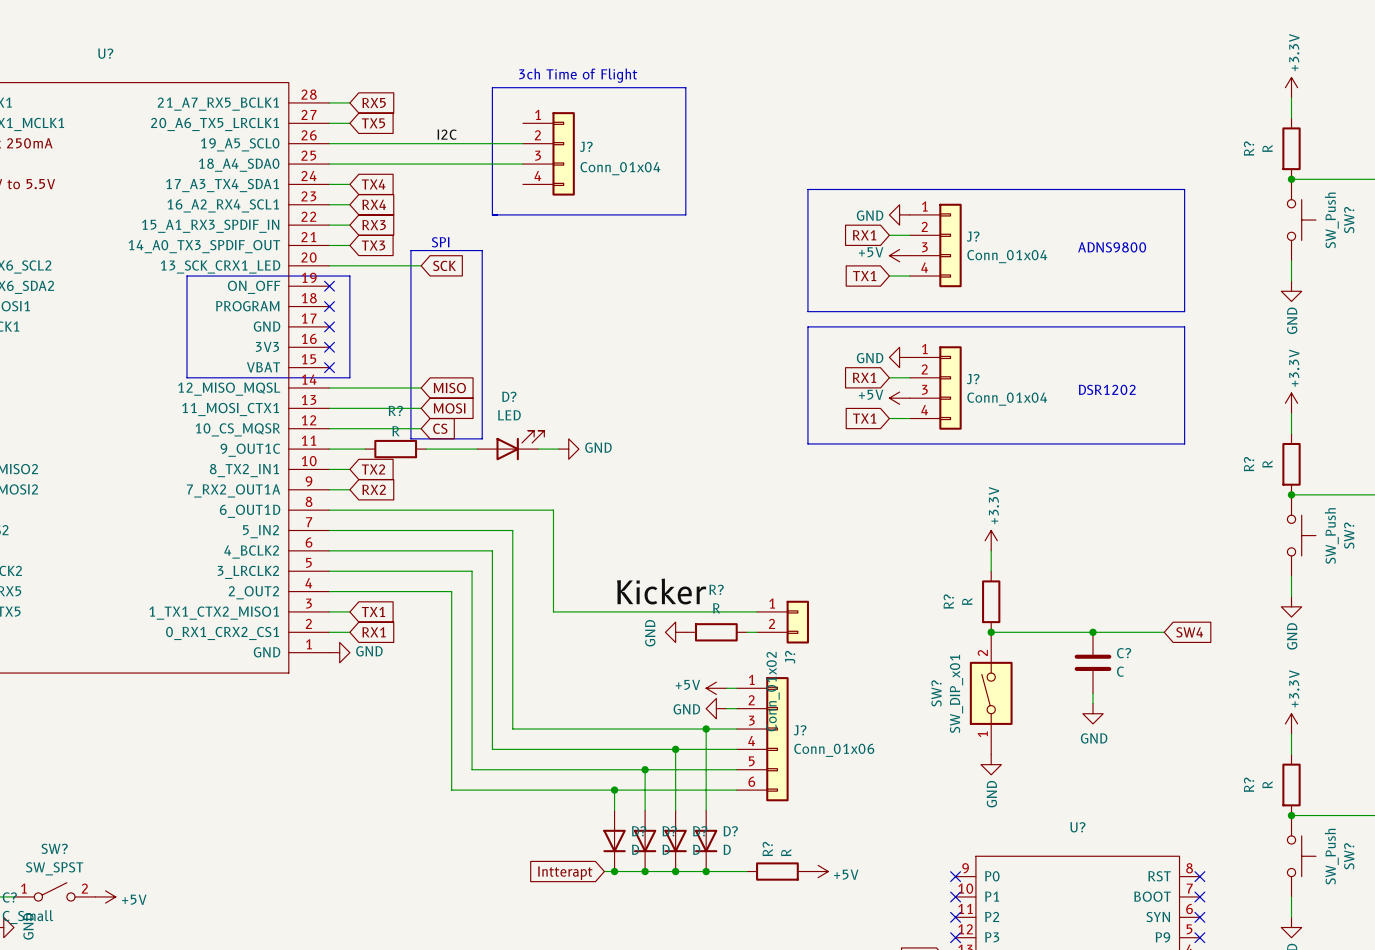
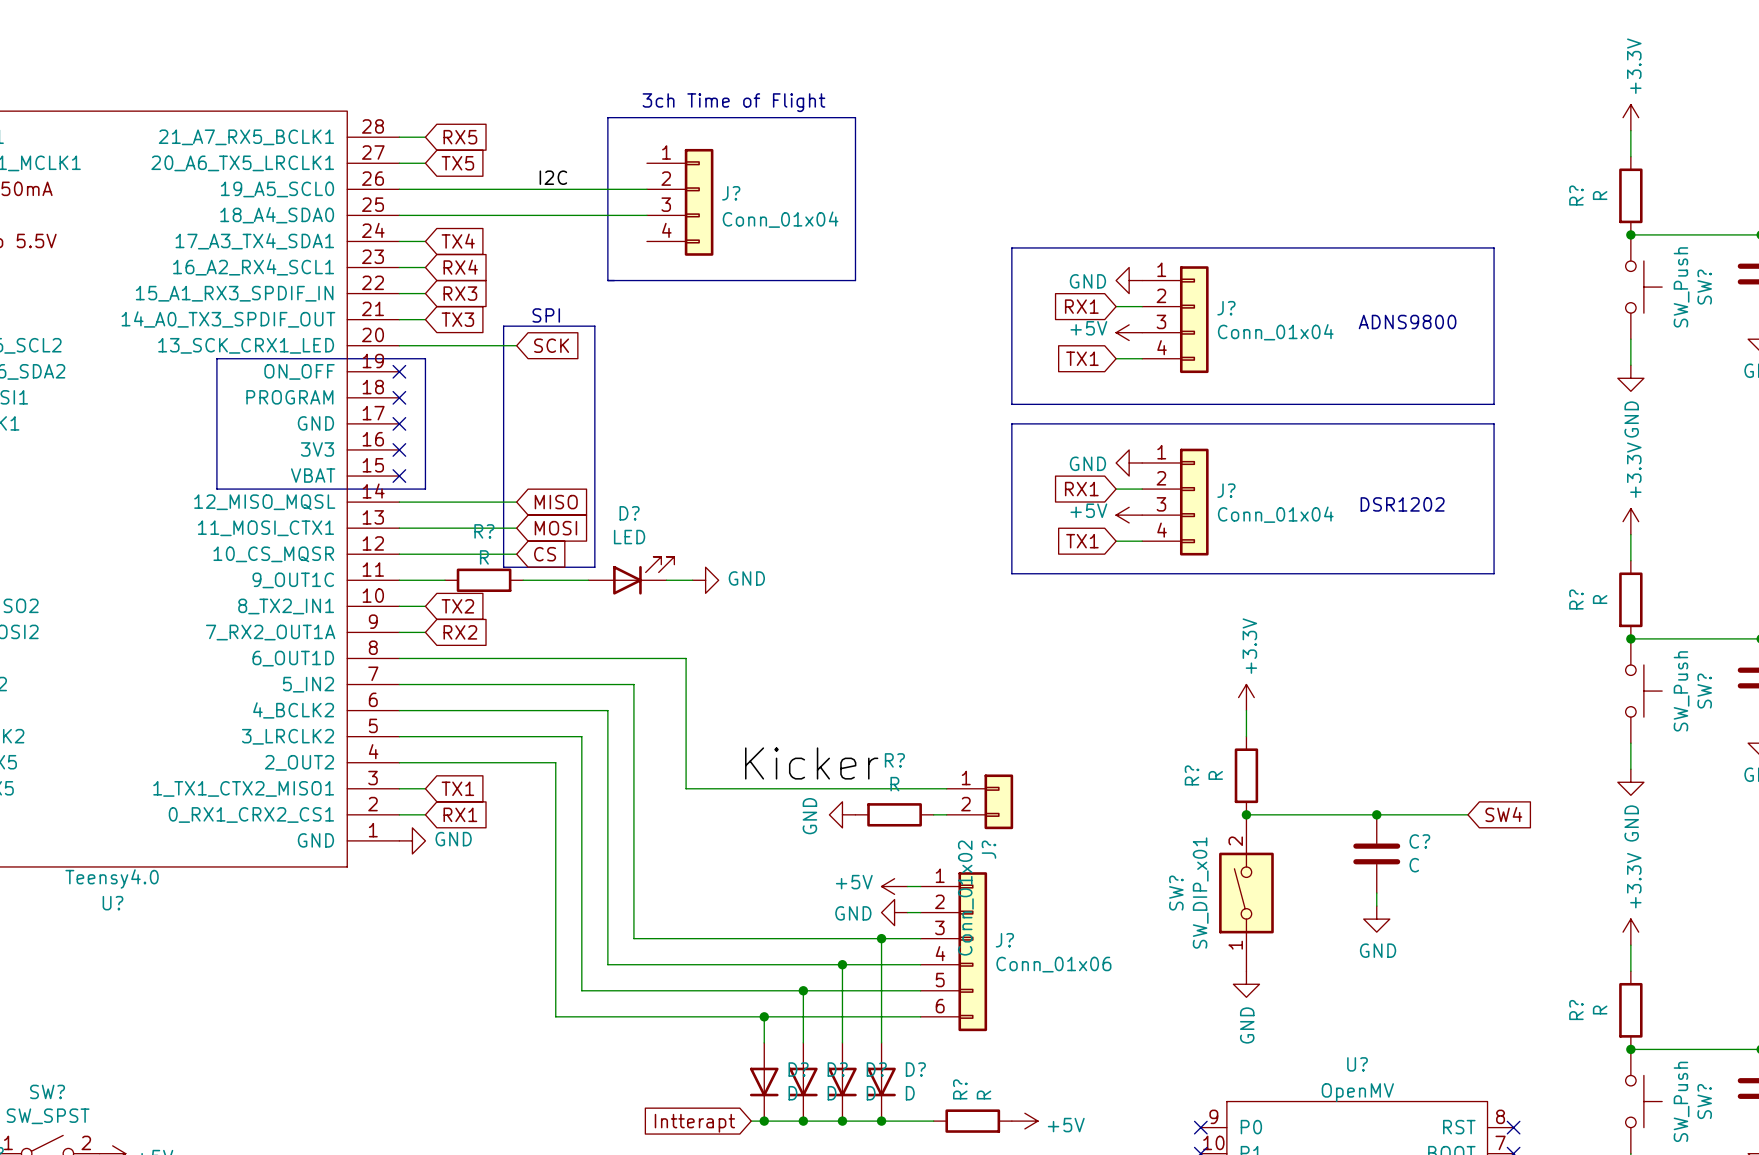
U? name position: U? (105, 53) -> U? (112, 903)
U? value: none -> Teensy4.0 (112, 878)
U? value: none -> OpenMV (1357, 1092)

